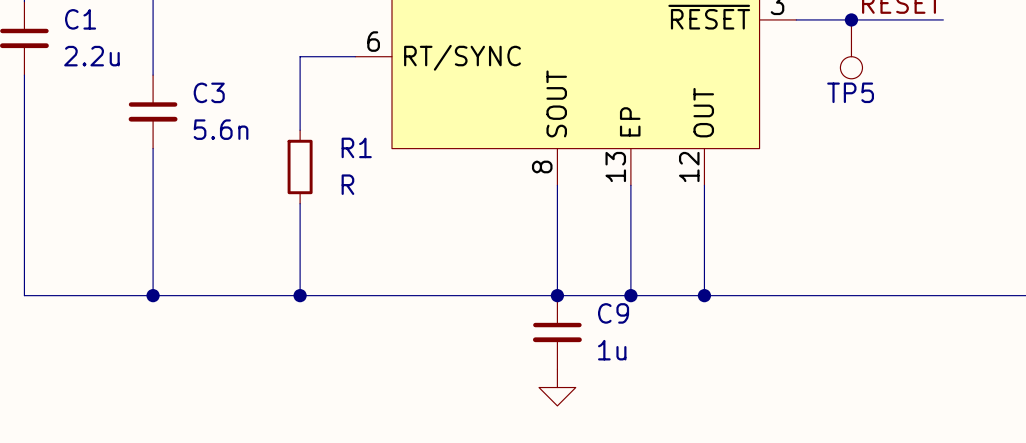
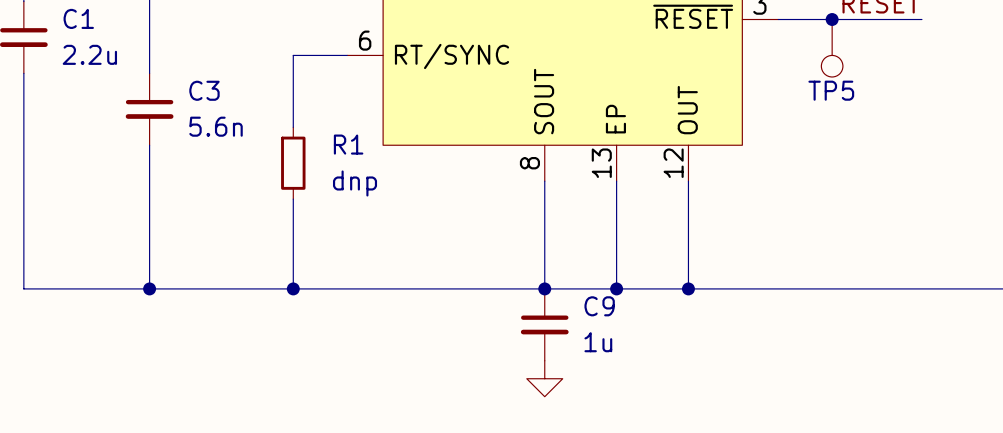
R1 value: R (347, 184) -> dnp (355, 183)

